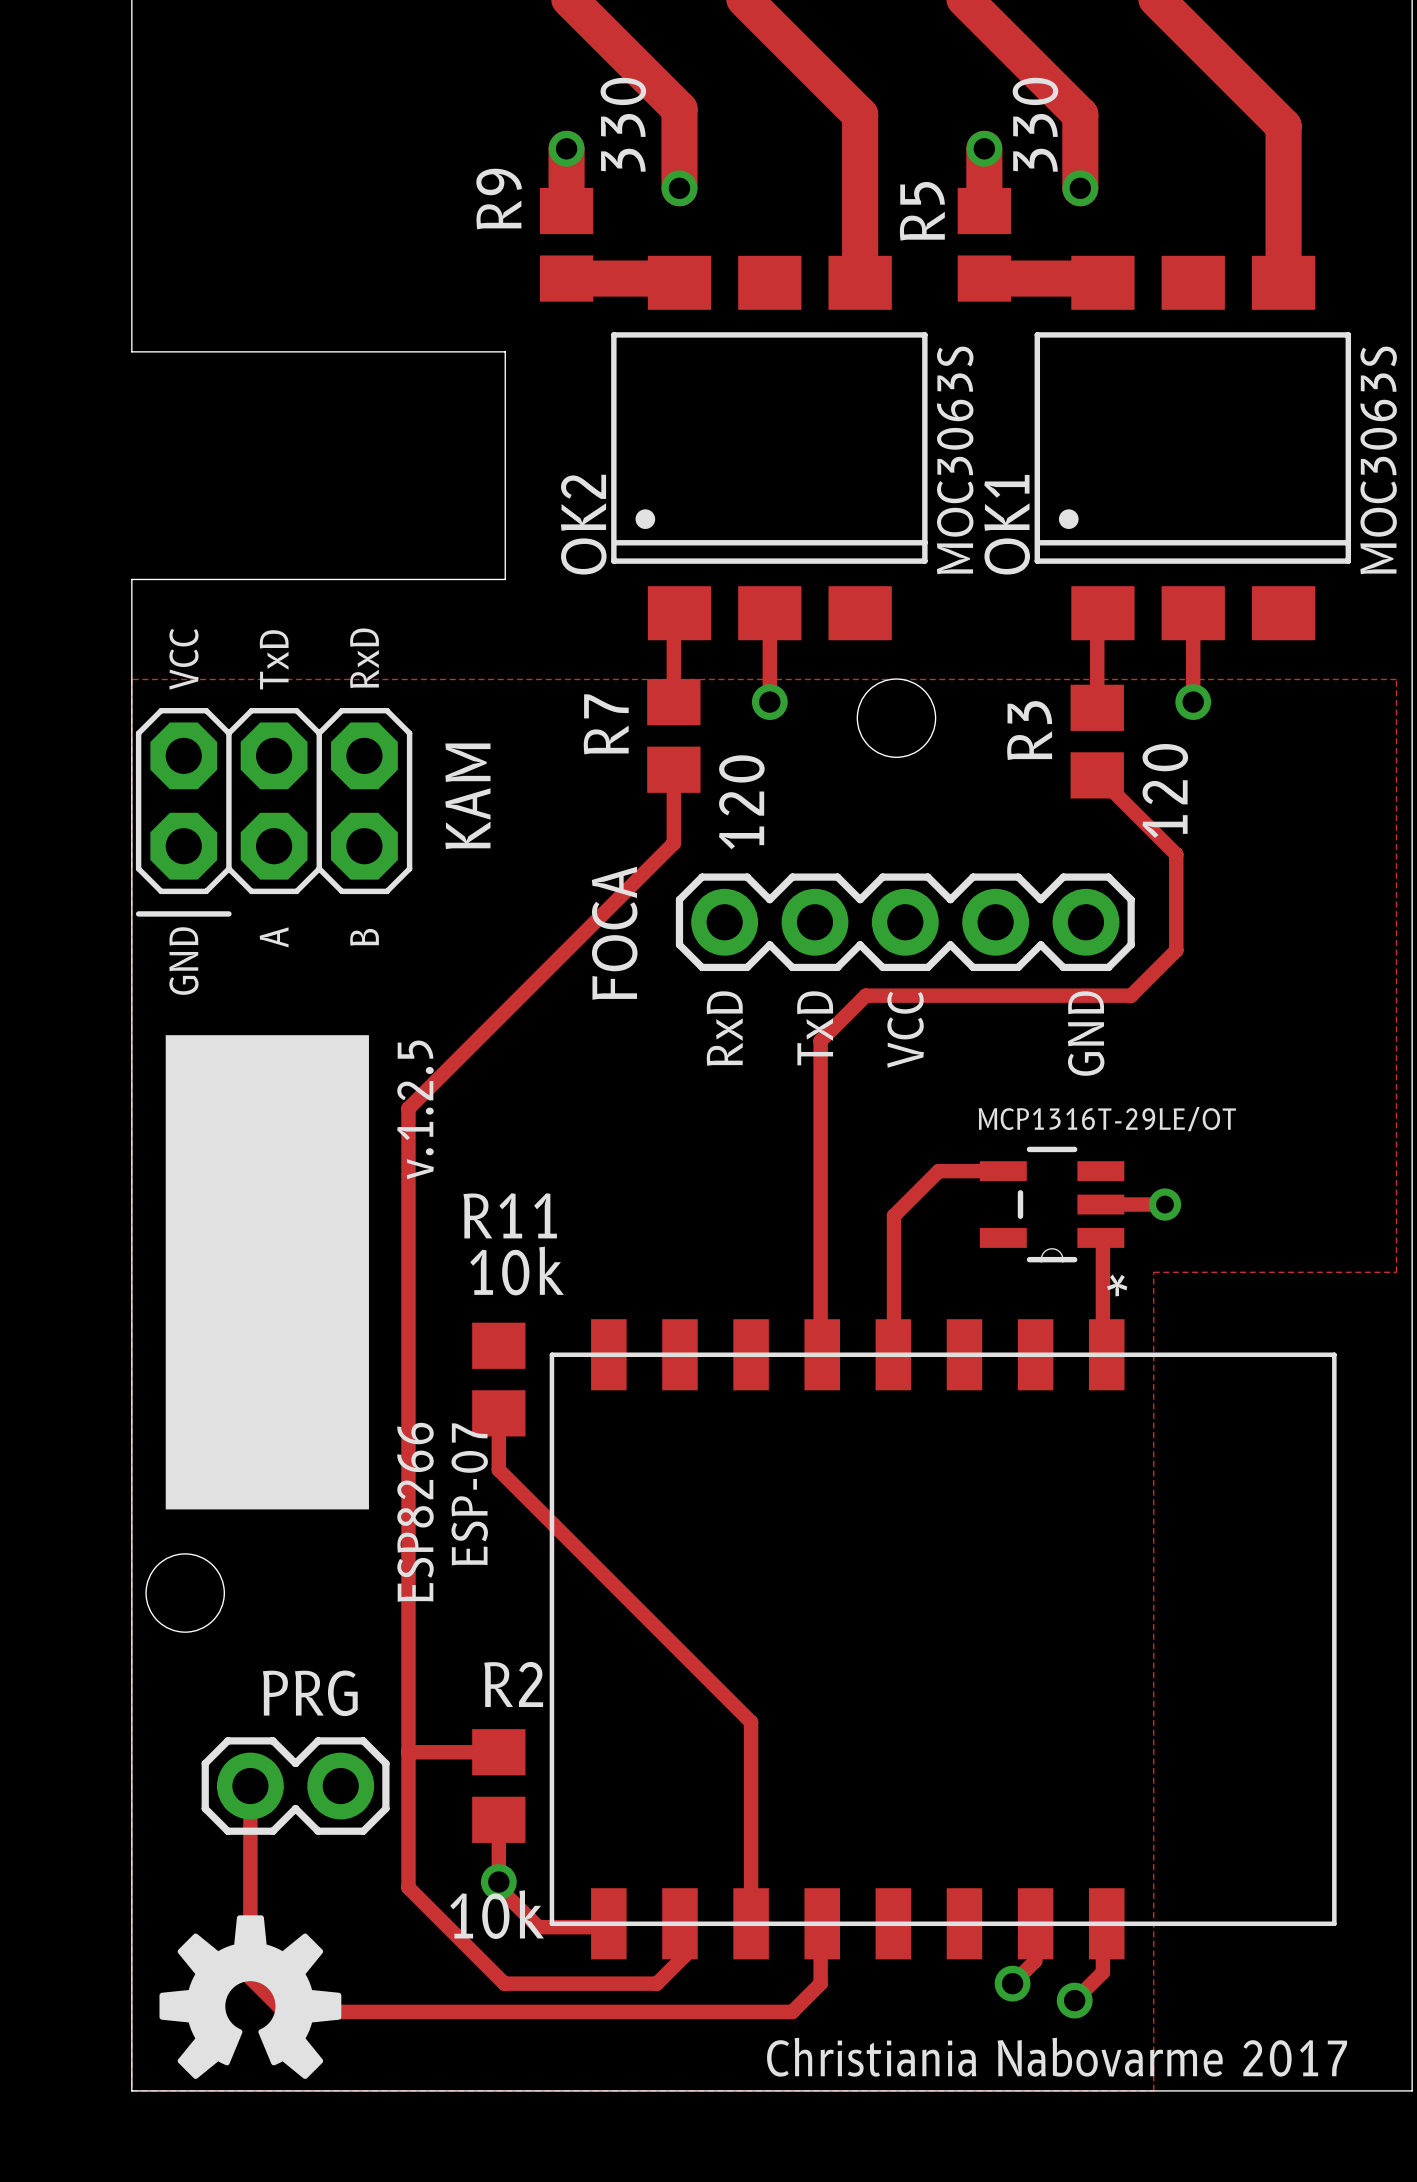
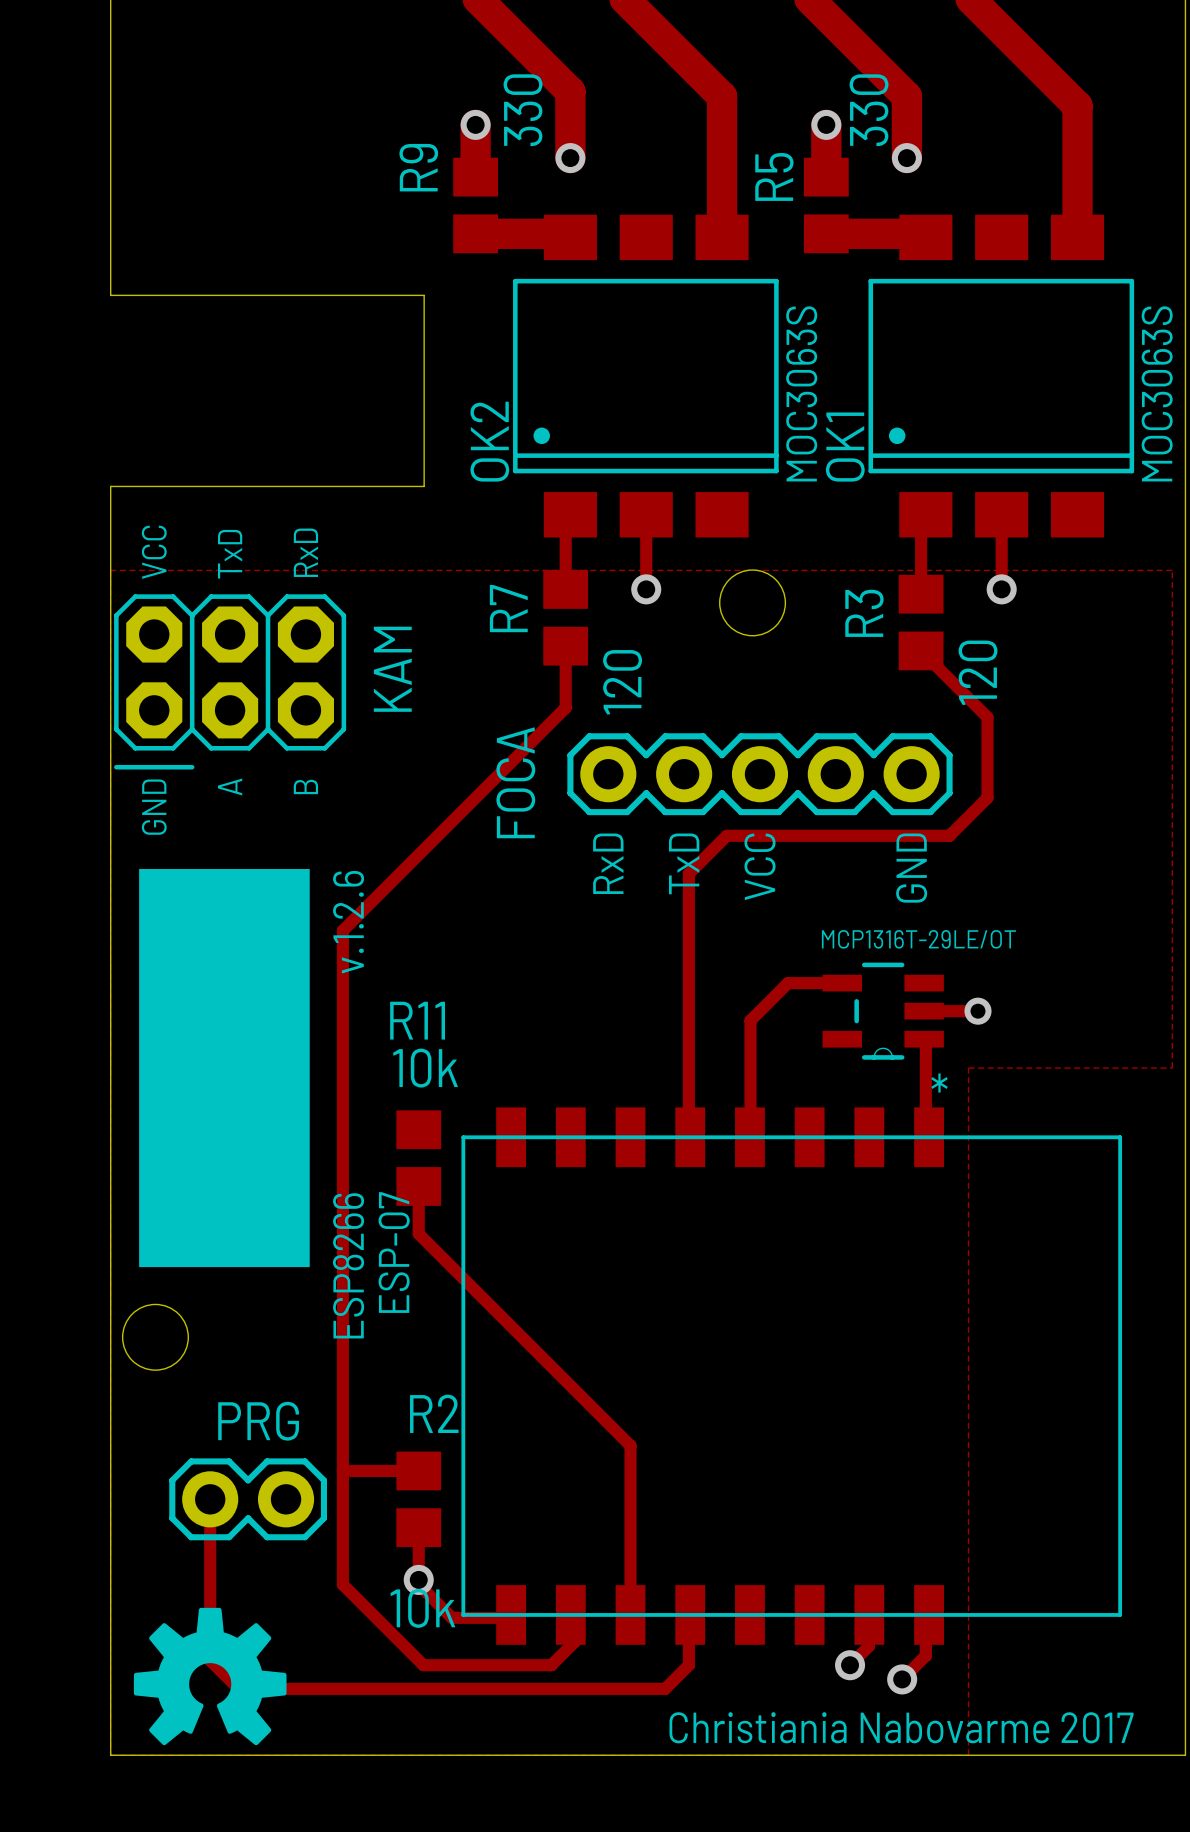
text: v.1.2.5 (415, 1109) -> v.1.2.6 (348, 922)

